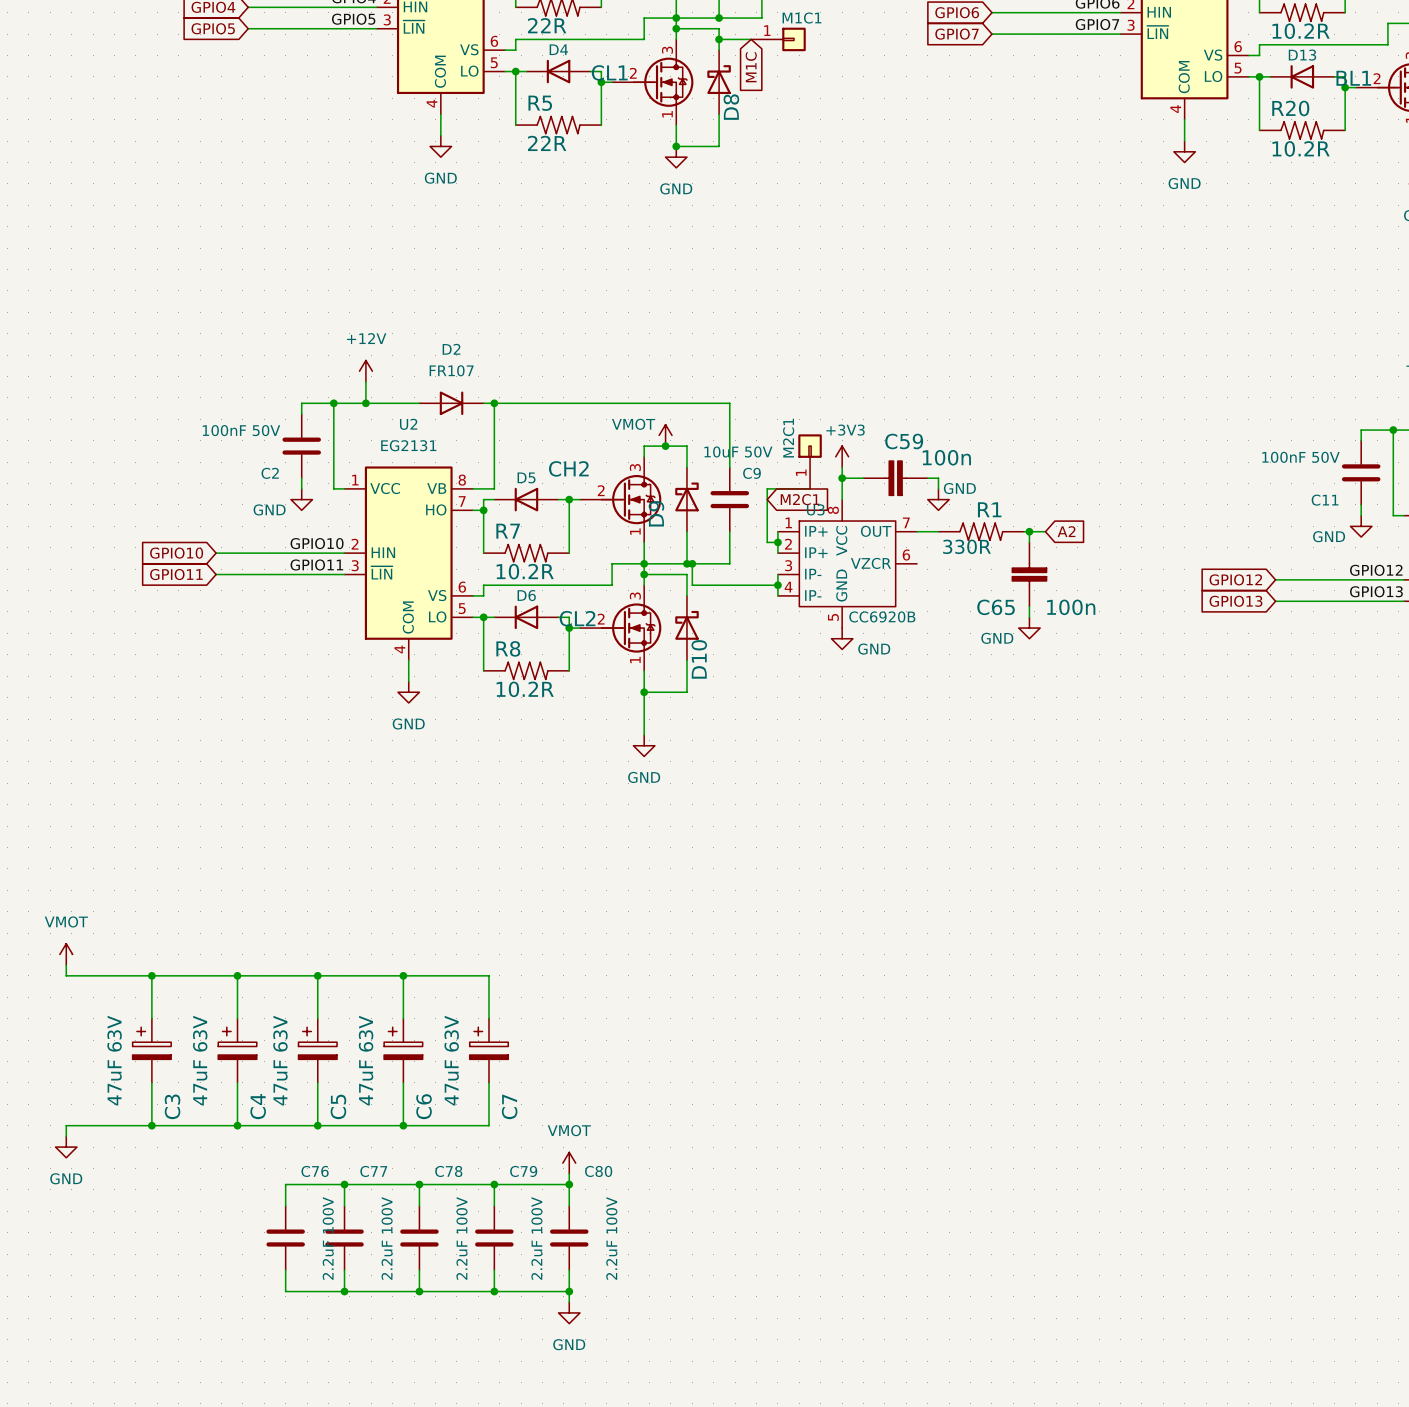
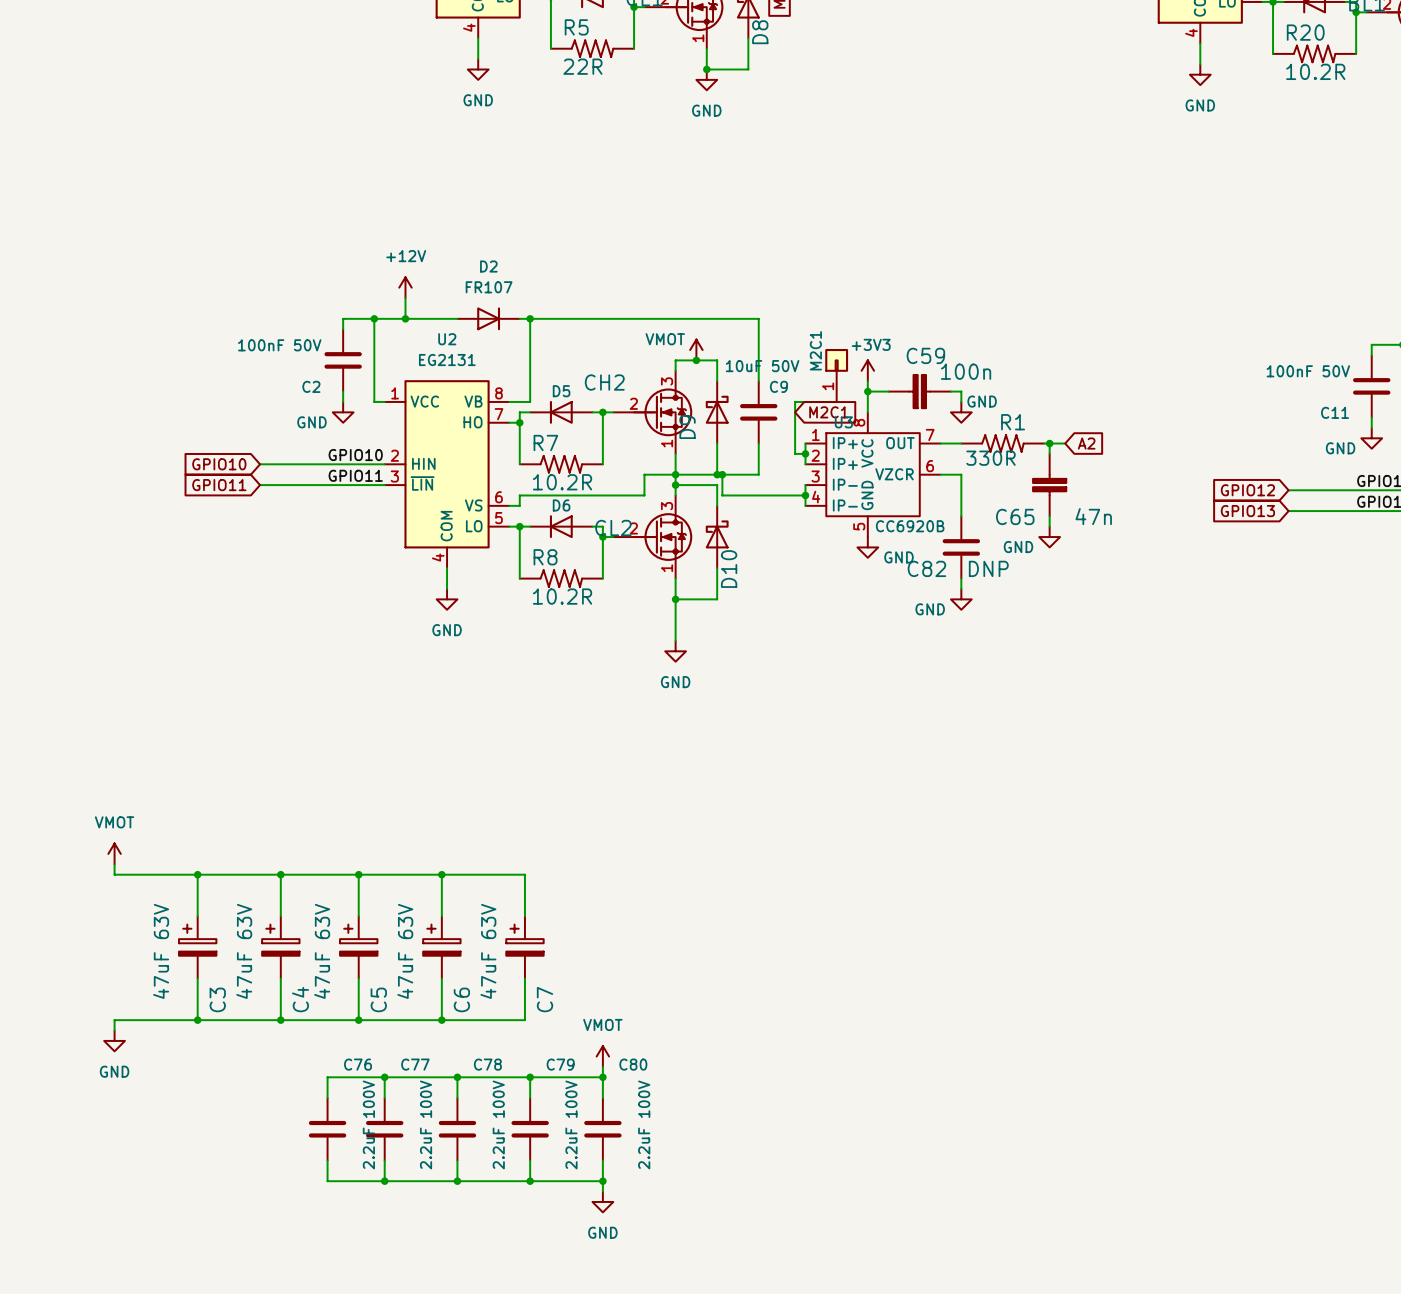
wire: none -> (940, 474) (961, 474) (961, 516)
C65 value: 100n (1071, 607) -> 47n (1093, 516)
C82: none -> DNP (961, 547)
wire: none -> (961, 578) (961, 588)
power symbol: none -> GND (961, 599)

